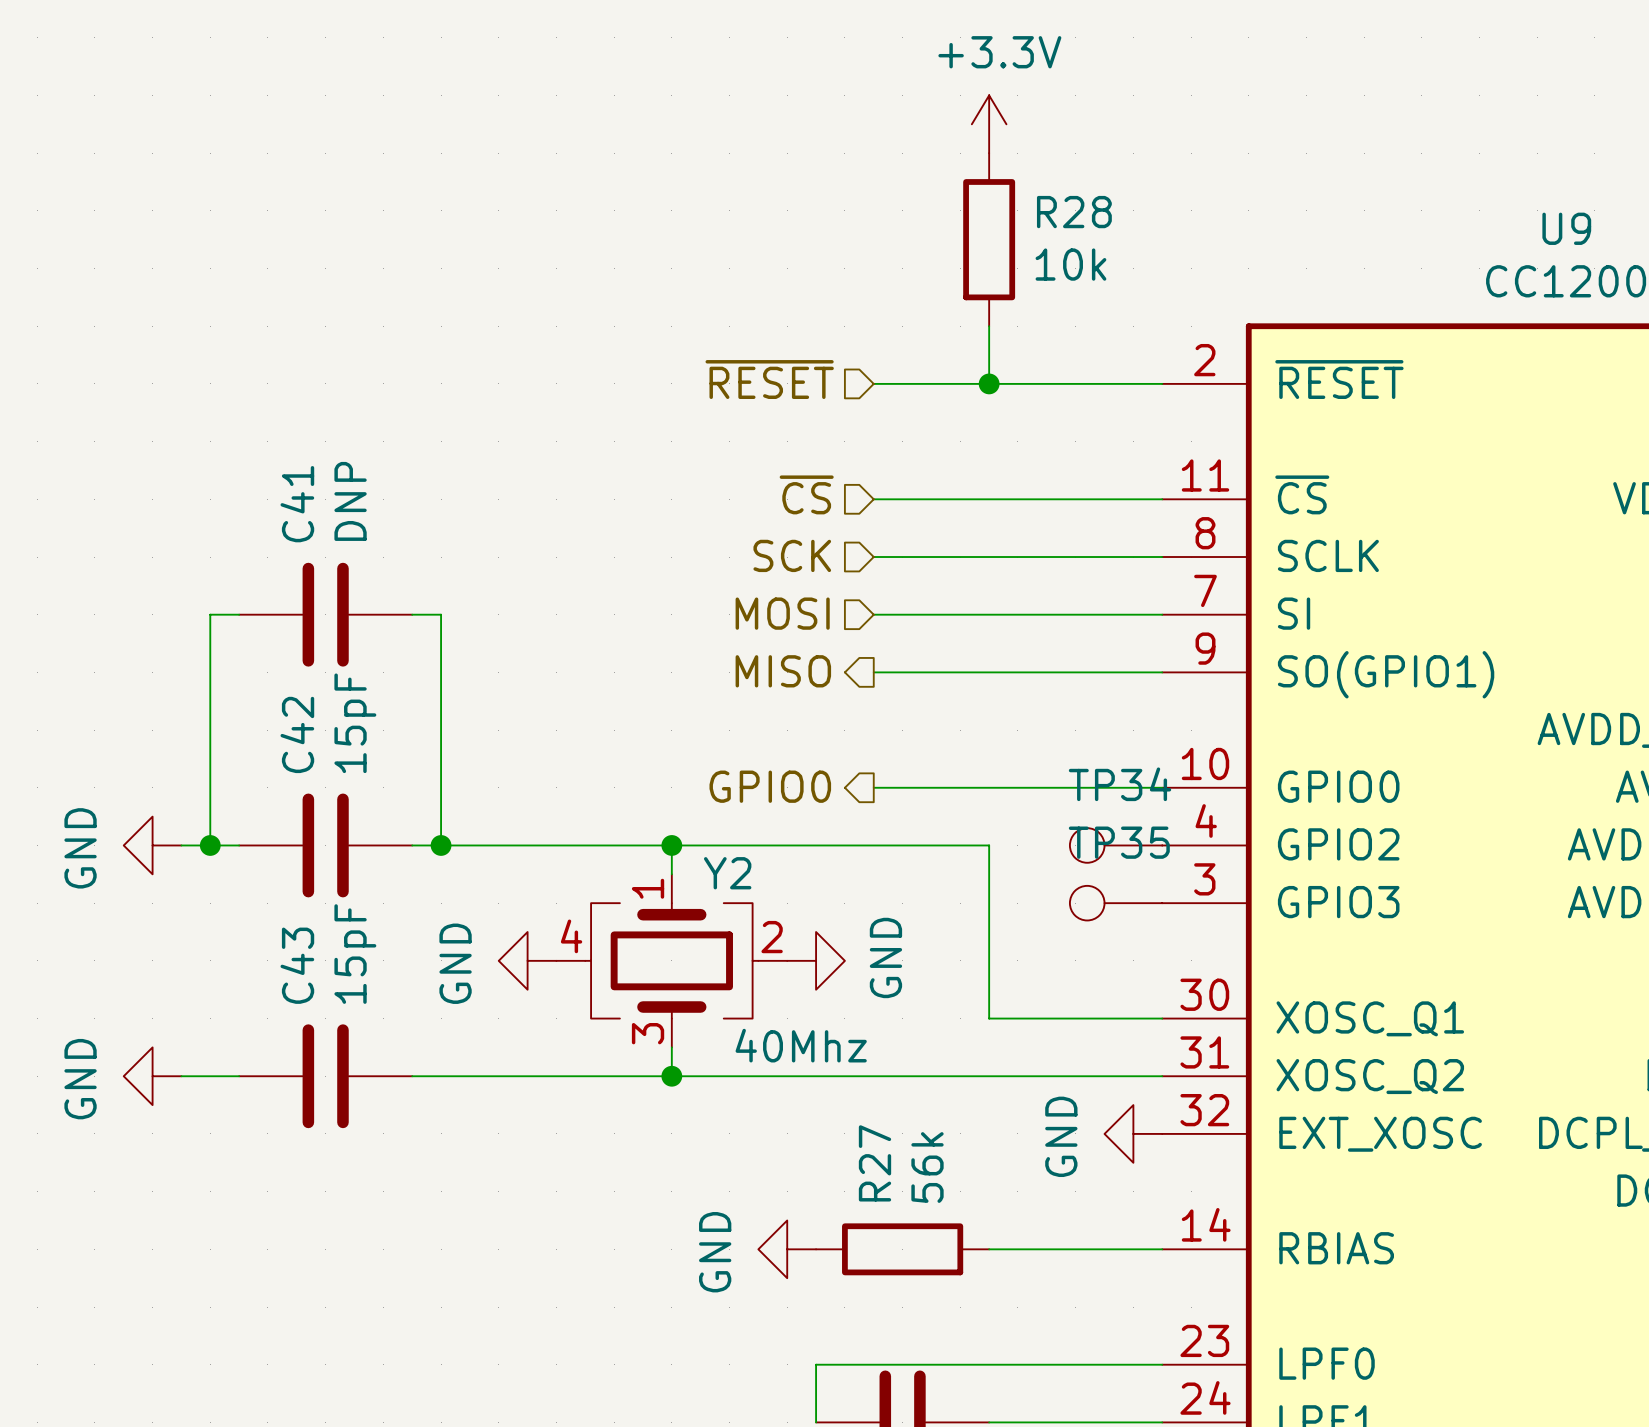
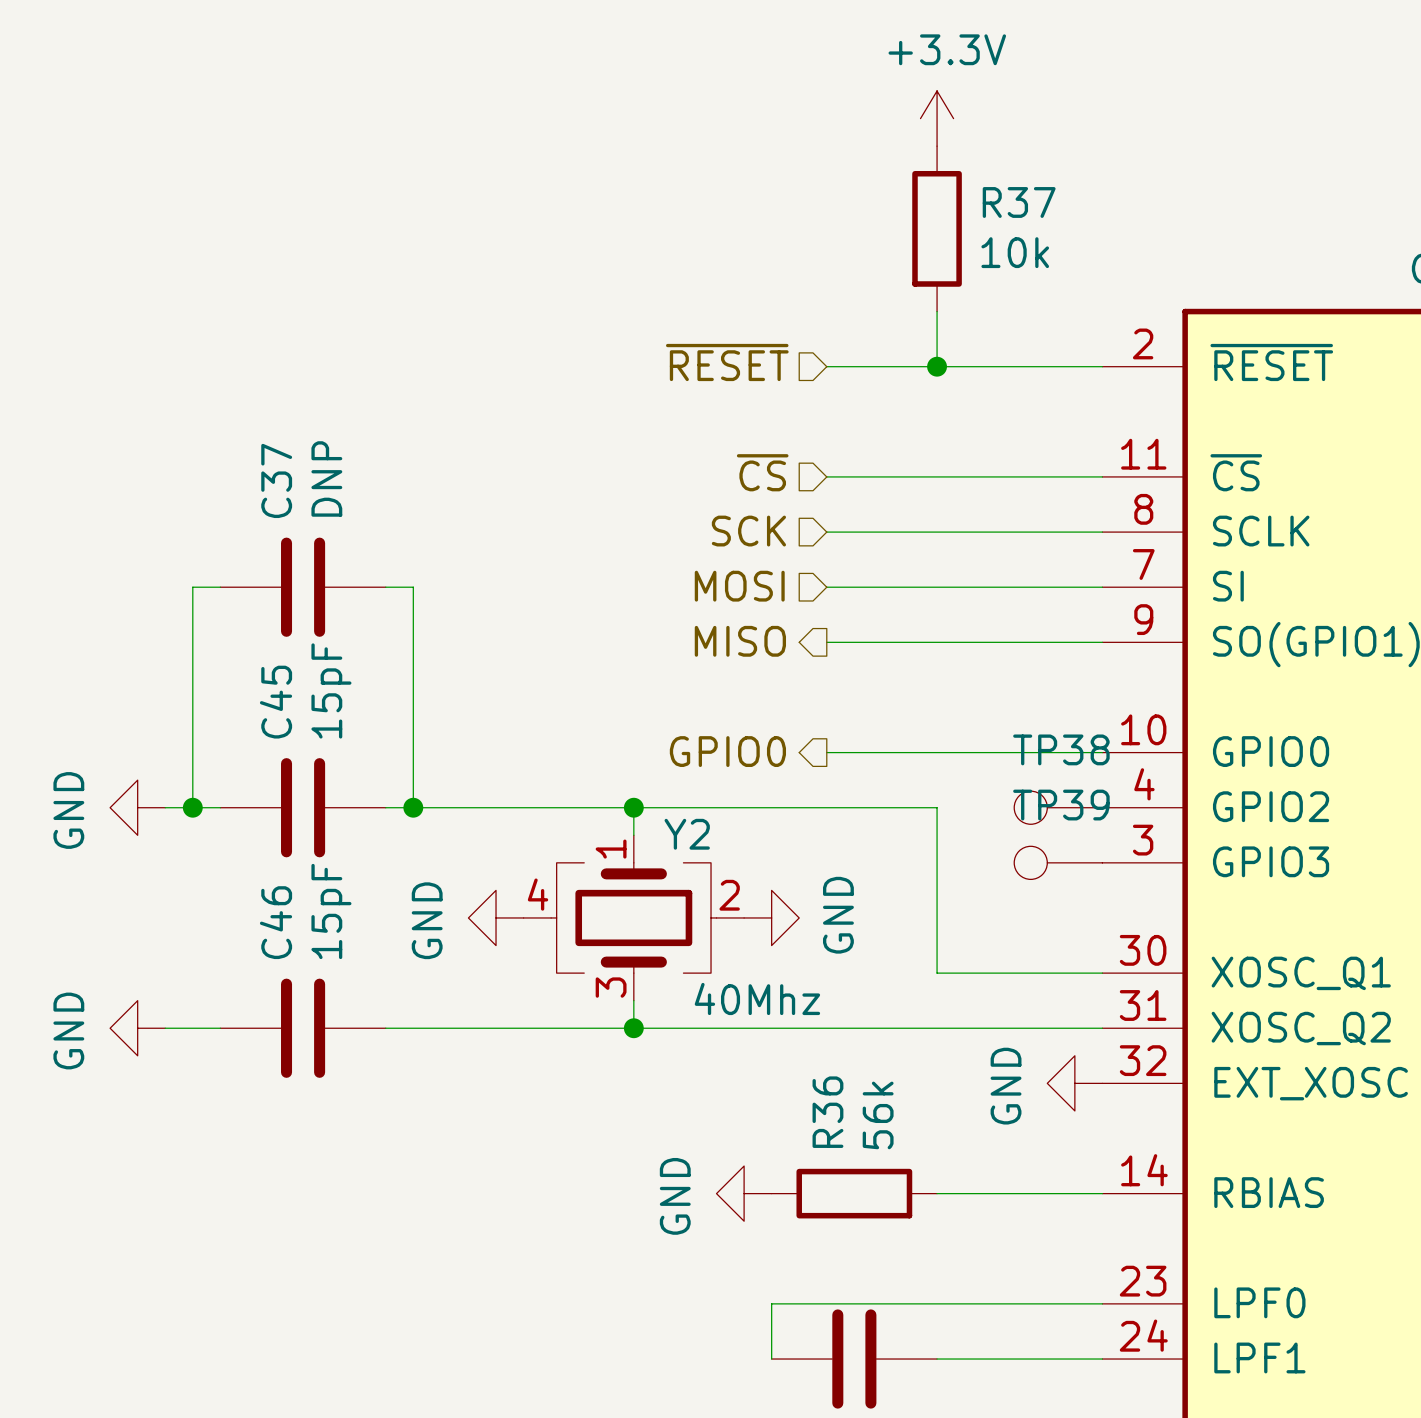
R28 name: R28 (1074, 212) -> R37 (1019, 202)
C41 name: C41 (297, 504) -> C37 (276, 480)
C42 name: C42 (297, 734) -> C45 (276, 702)
TP34 name: TP34 (1120, 784) -> TP38 (1061, 749)
TP35 name: TP35 (1119, 842) -> TP39 (1061, 805)
C43 name: C43 (297, 965) -> C46 (276, 922)
R27 name: R27 (874, 1163) -> R36 (827, 1112)

